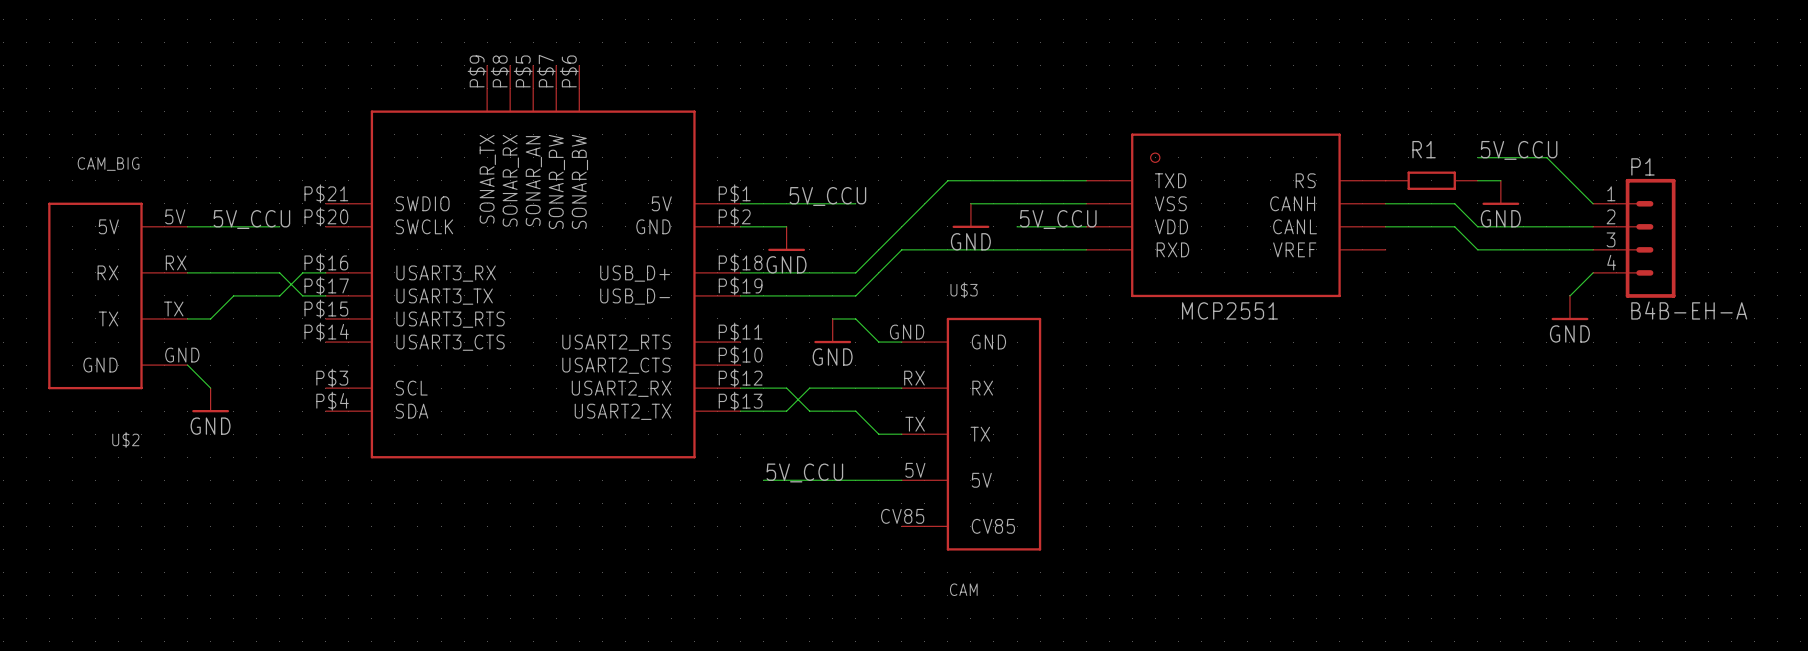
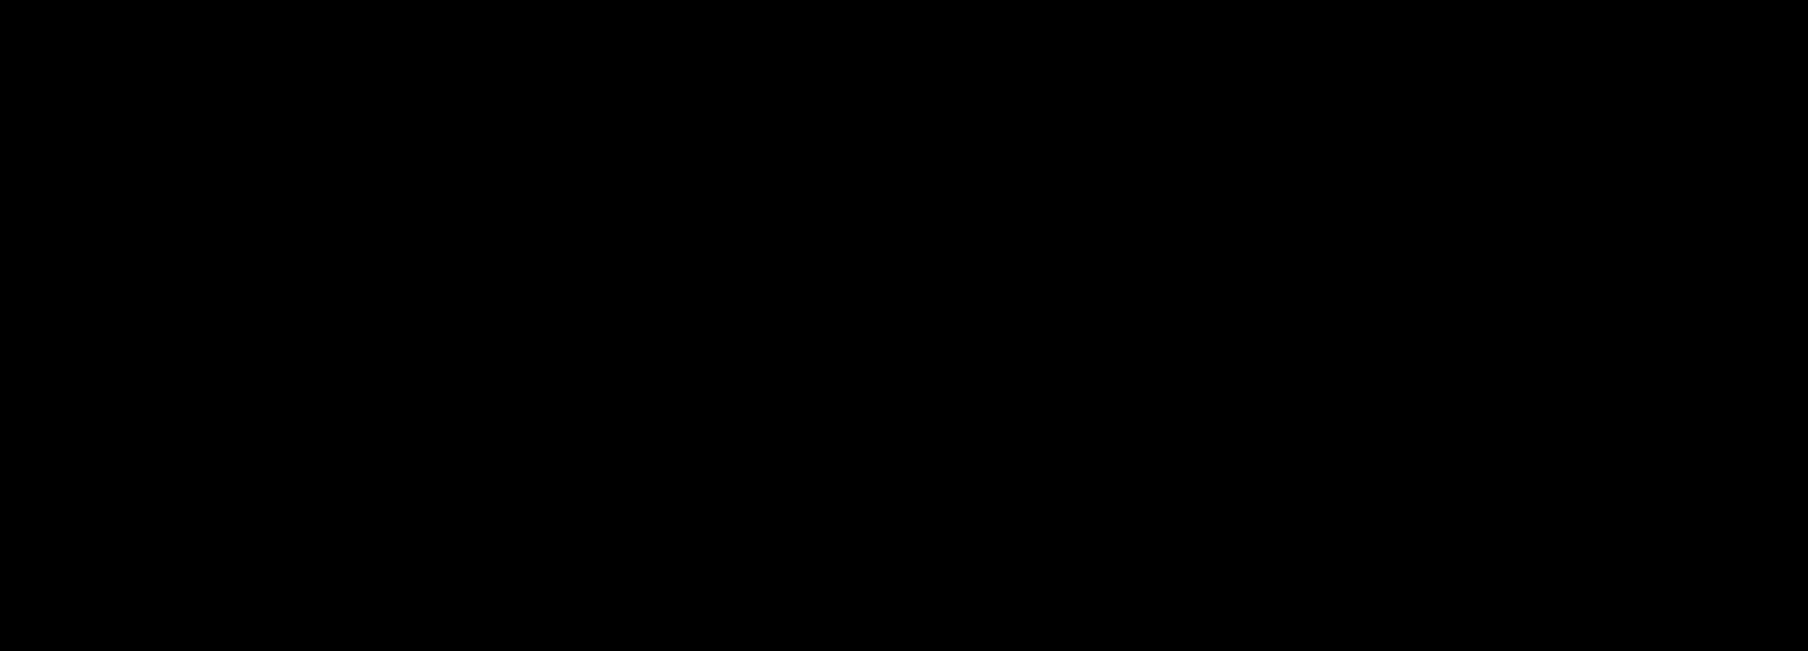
label: 5V_CCU (1519, 150) -> none
wire: (1477, 157) (1546, 157) (1593, 203) -> none
wire: (1086, 180) (947, 180) (855, 272) (740, 272) -> none
R1: (1431, 180) -> none
wire: (1477, 180) (1500, 180) -> none
power symbol: GND (1500, 192) -> none
label: 5V_CCU (827, 196) -> none
wire: (740, 203) (855, 203) -> none
wire: (970, 203) (1086, 203) -> none
wire: (1385, 203) (1454, 203) (1477, 226) (1593, 226) -> none
power symbol: GND (970, 215) -> none
part: (1235, 215) -> none
label: 5V_CCU (251, 219) -> none
label: 5V_CCU (1058, 219) -> none
wire: (187, 226) (279, 226) -> none
wire: (740, 226) (786, 226) -> none
wire: (1017, 226) (1086, 226) -> none
wire: (1385, 226) (1454, 226) (1477, 249) (1593, 249) -> none
power symbol: GND (786, 238) -> none
P1: B4B-EH-A (1634, 238) -> none
wire: (1086, 249) (901, 249) (855, 295) (740, 295) -> none
part: (533, 261) -> none
wire: (187, 272) (279, 272) (302, 295) (325, 295) -> none
wire: (325, 272) (302, 272) (279, 295) (233, 295) (210, 318) (187, 318) -> none
wire: (1593, 272) (1569, 295) -> none
U$2: CAM_BIG (117, 295) -> none
power symbol: GND (1569, 308) -> none
wire: (832, 318) (855, 318) (878, 342) (901, 342) -> none
power symbol: GND (832, 331) -> none
wire: (187, 365) (210, 388) -> none
wire: (740, 388) (786, 388) (809, 411) (855, 411) (878, 434) (901, 434) -> none
wire: (901, 388) (809, 388) (786, 411) (740, 411) -> none
power symbol: GND (210, 400) -> none
U$3: CAM (971, 434) -> none
label: 5V_CCU (804, 472) -> none
wire: (763, 480) (901, 480) -> none

